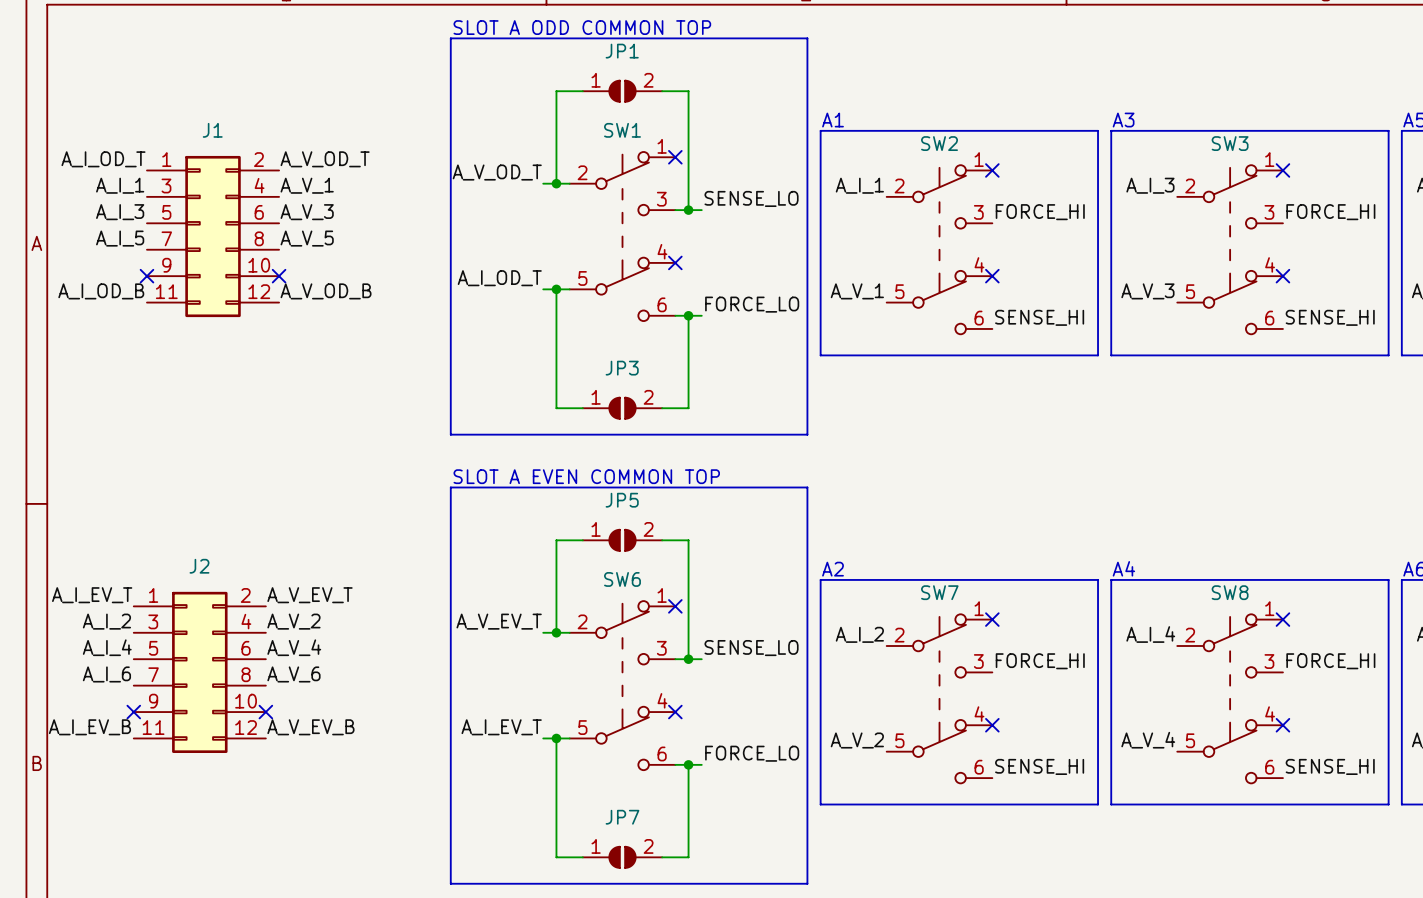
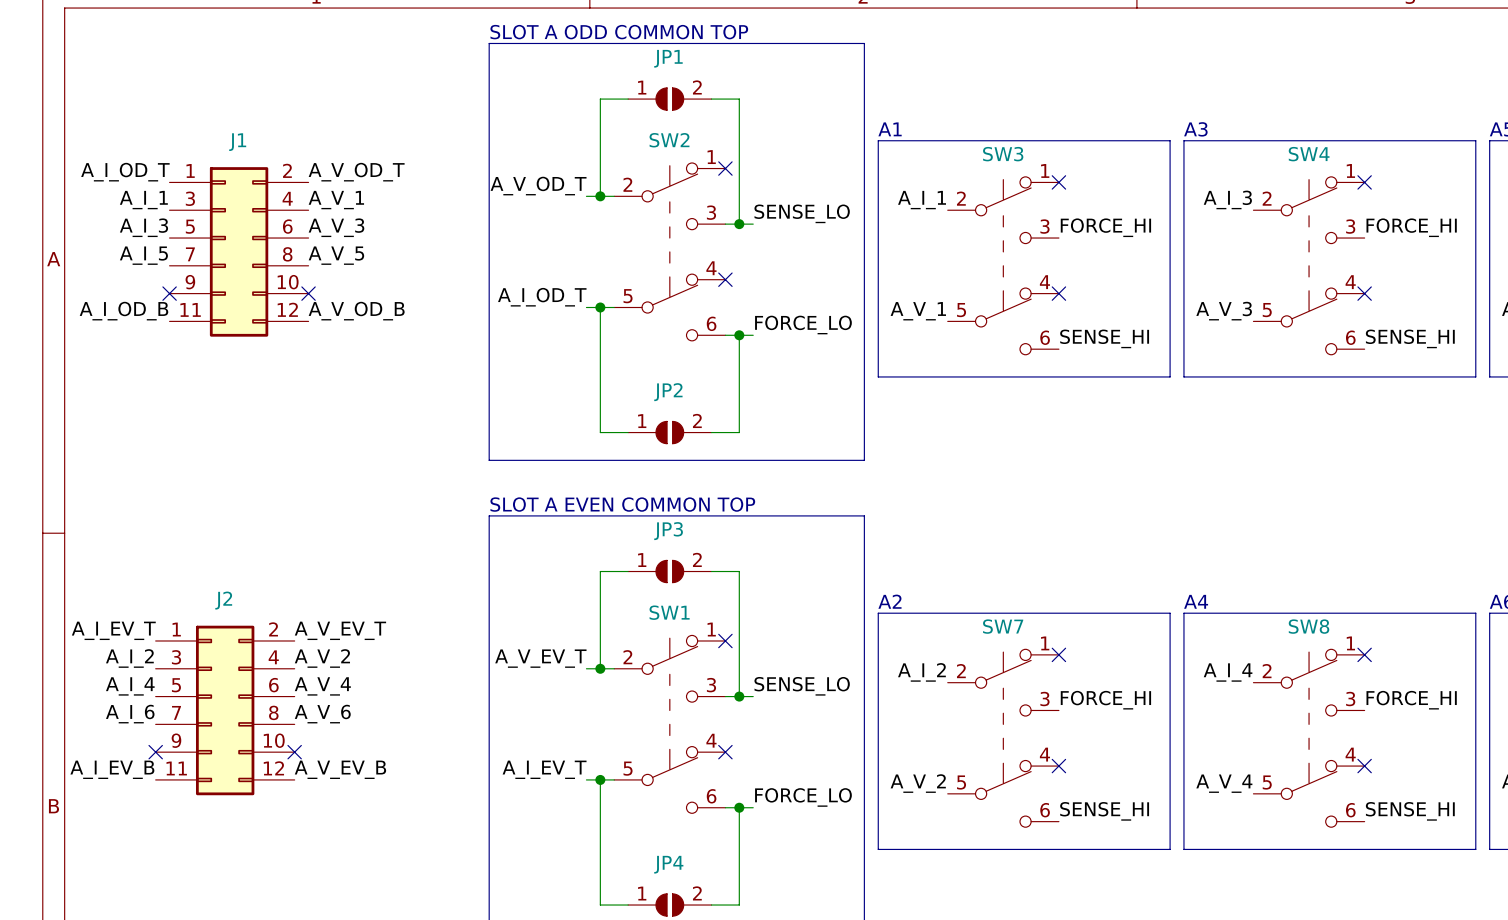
SW1 name: SW1 (622, 130) -> SW2 (669, 140)
SW2 name: SW2 (939, 143) -> SW3 (1003, 154)
SW3 name: SW3 (1230, 143) -> SW4 (1309, 154)
JP3 name: JP3 (622, 368) -> JP2 (668, 392)
JP5 name: JP5 (622, 500) -> JP3 (668, 531)
SW6 name: SW6 (622, 579) -> SW1 (669, 612)
JP7 name: JP7 (622, 817) -> JP4 (668, 864)

